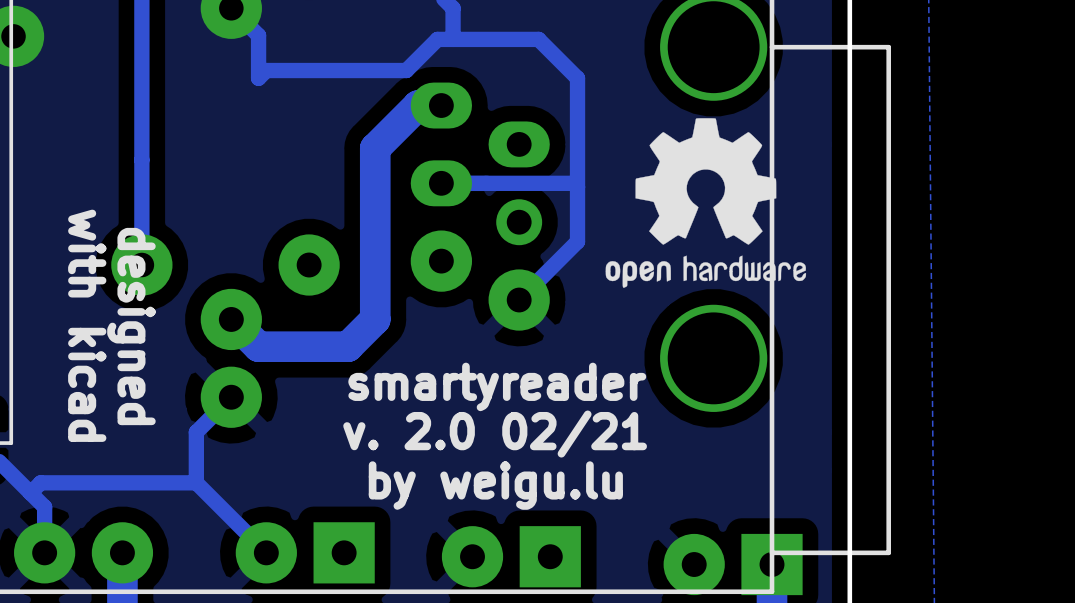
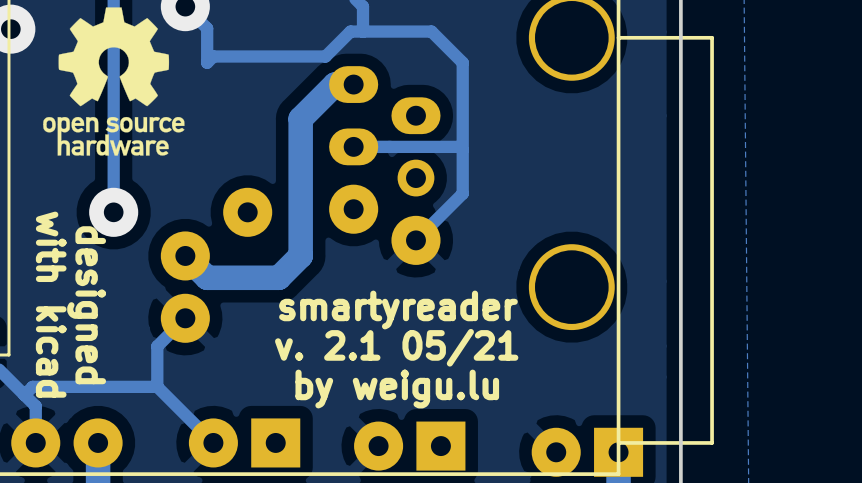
drawing: none -> [43, 7, 185, 156]
drawing: [605, 118, 807, 288] -> none
text position: with kicad (87, 325) -> with kicad (51, 304)
text position: designed (131, 326) -> designed (86, 305)
text: v. 2.0 02/21 (495, 434) -> v. 2.1 05/21 (396, 347)

